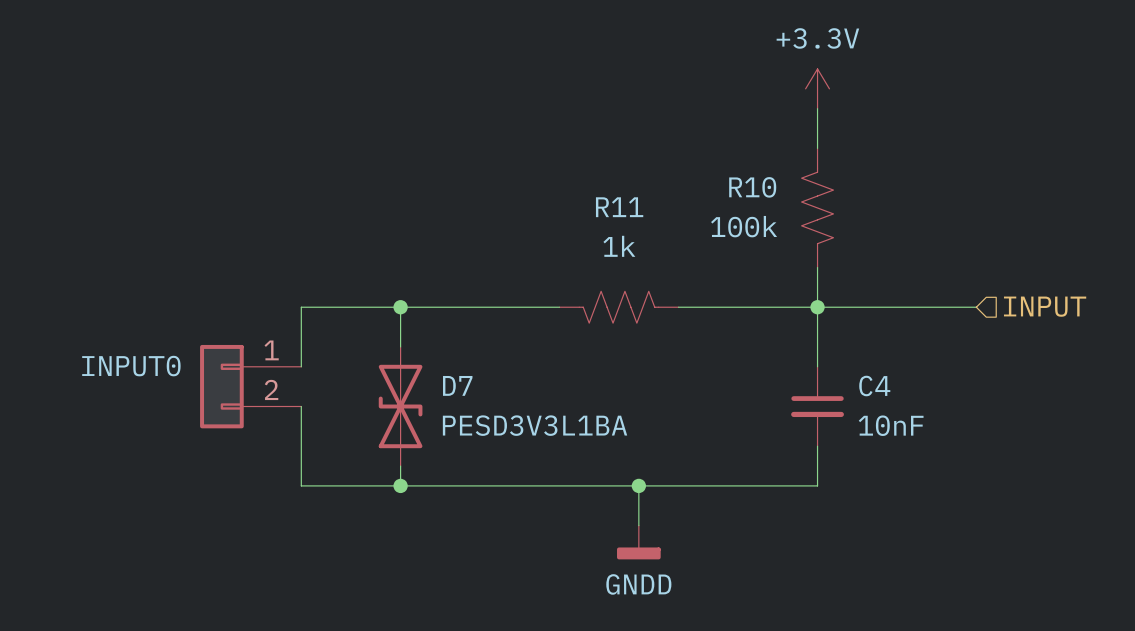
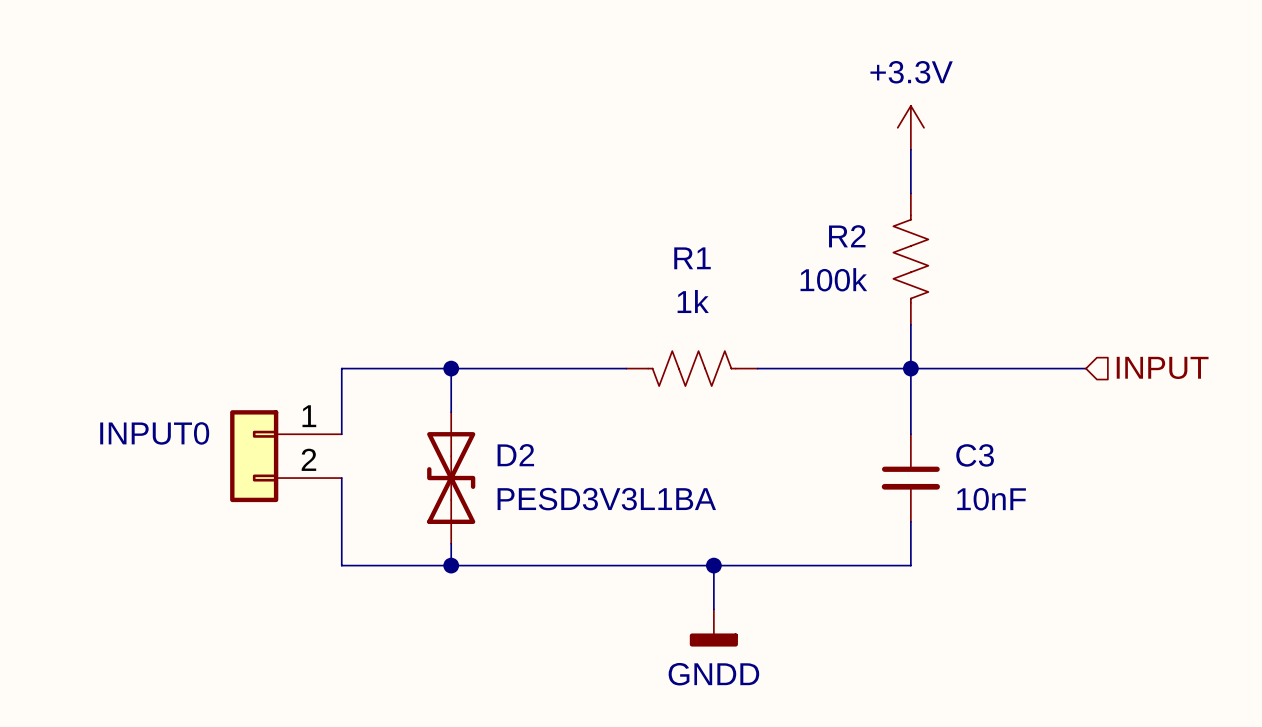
R10 name: R10 (752, 187) -> R2 (847, 236)
R11 name: R11 (619, 207) -> R1 (692, 258)
D7 name: D7 (457, 385) -> D2 (515, 455)
C4 name: C4 (874, 386) -> C3 (975, 455)

